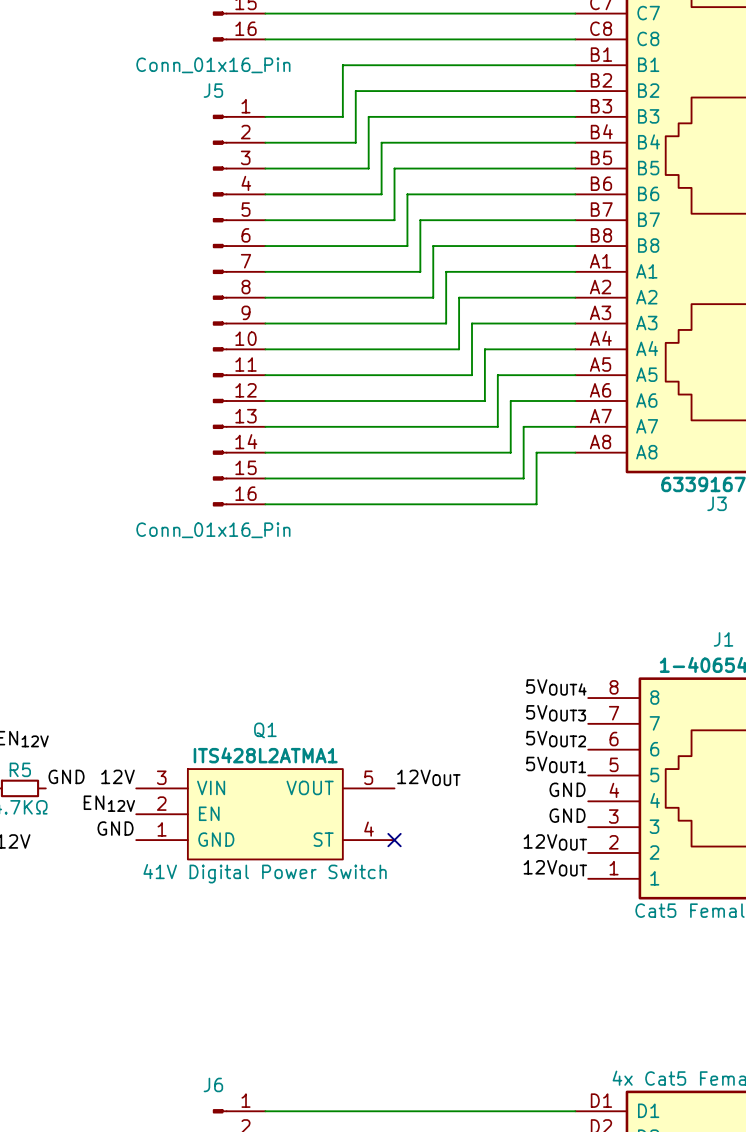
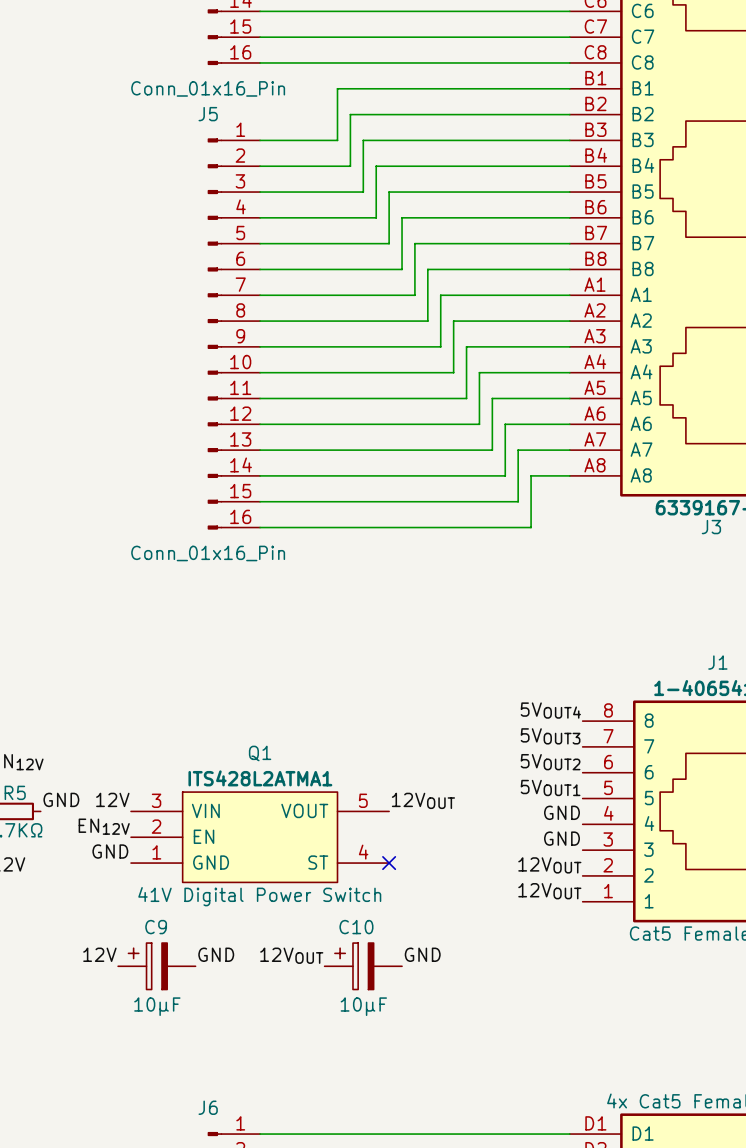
label: none -> 12V (99, 954)
label: none -> GND (216, 954)
label: none -> GND (422, 954)
label: none -> 12VOUT (291, 955)
C9: none -> 10μF (156, 966)
C10: none -> 10μF (363, 966)

